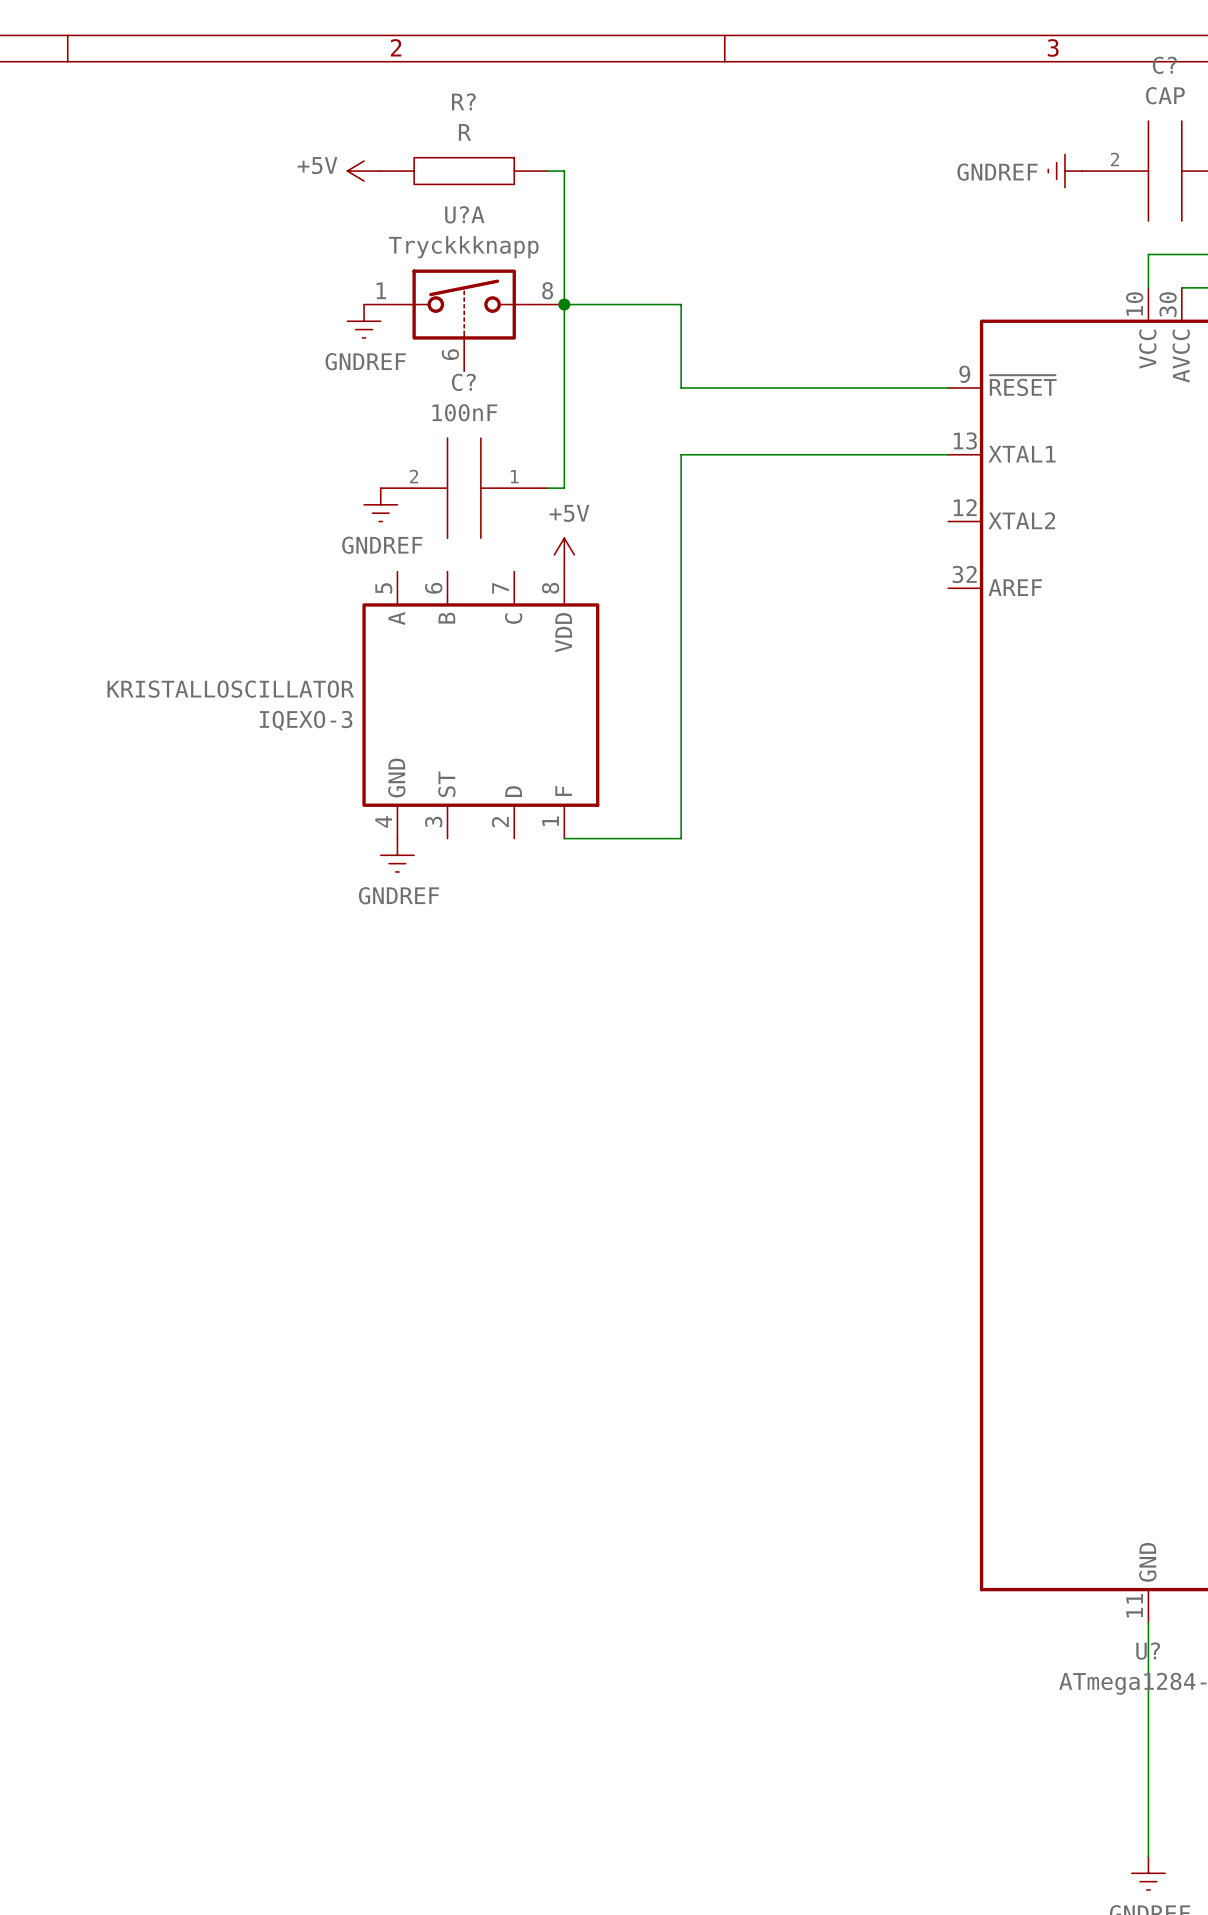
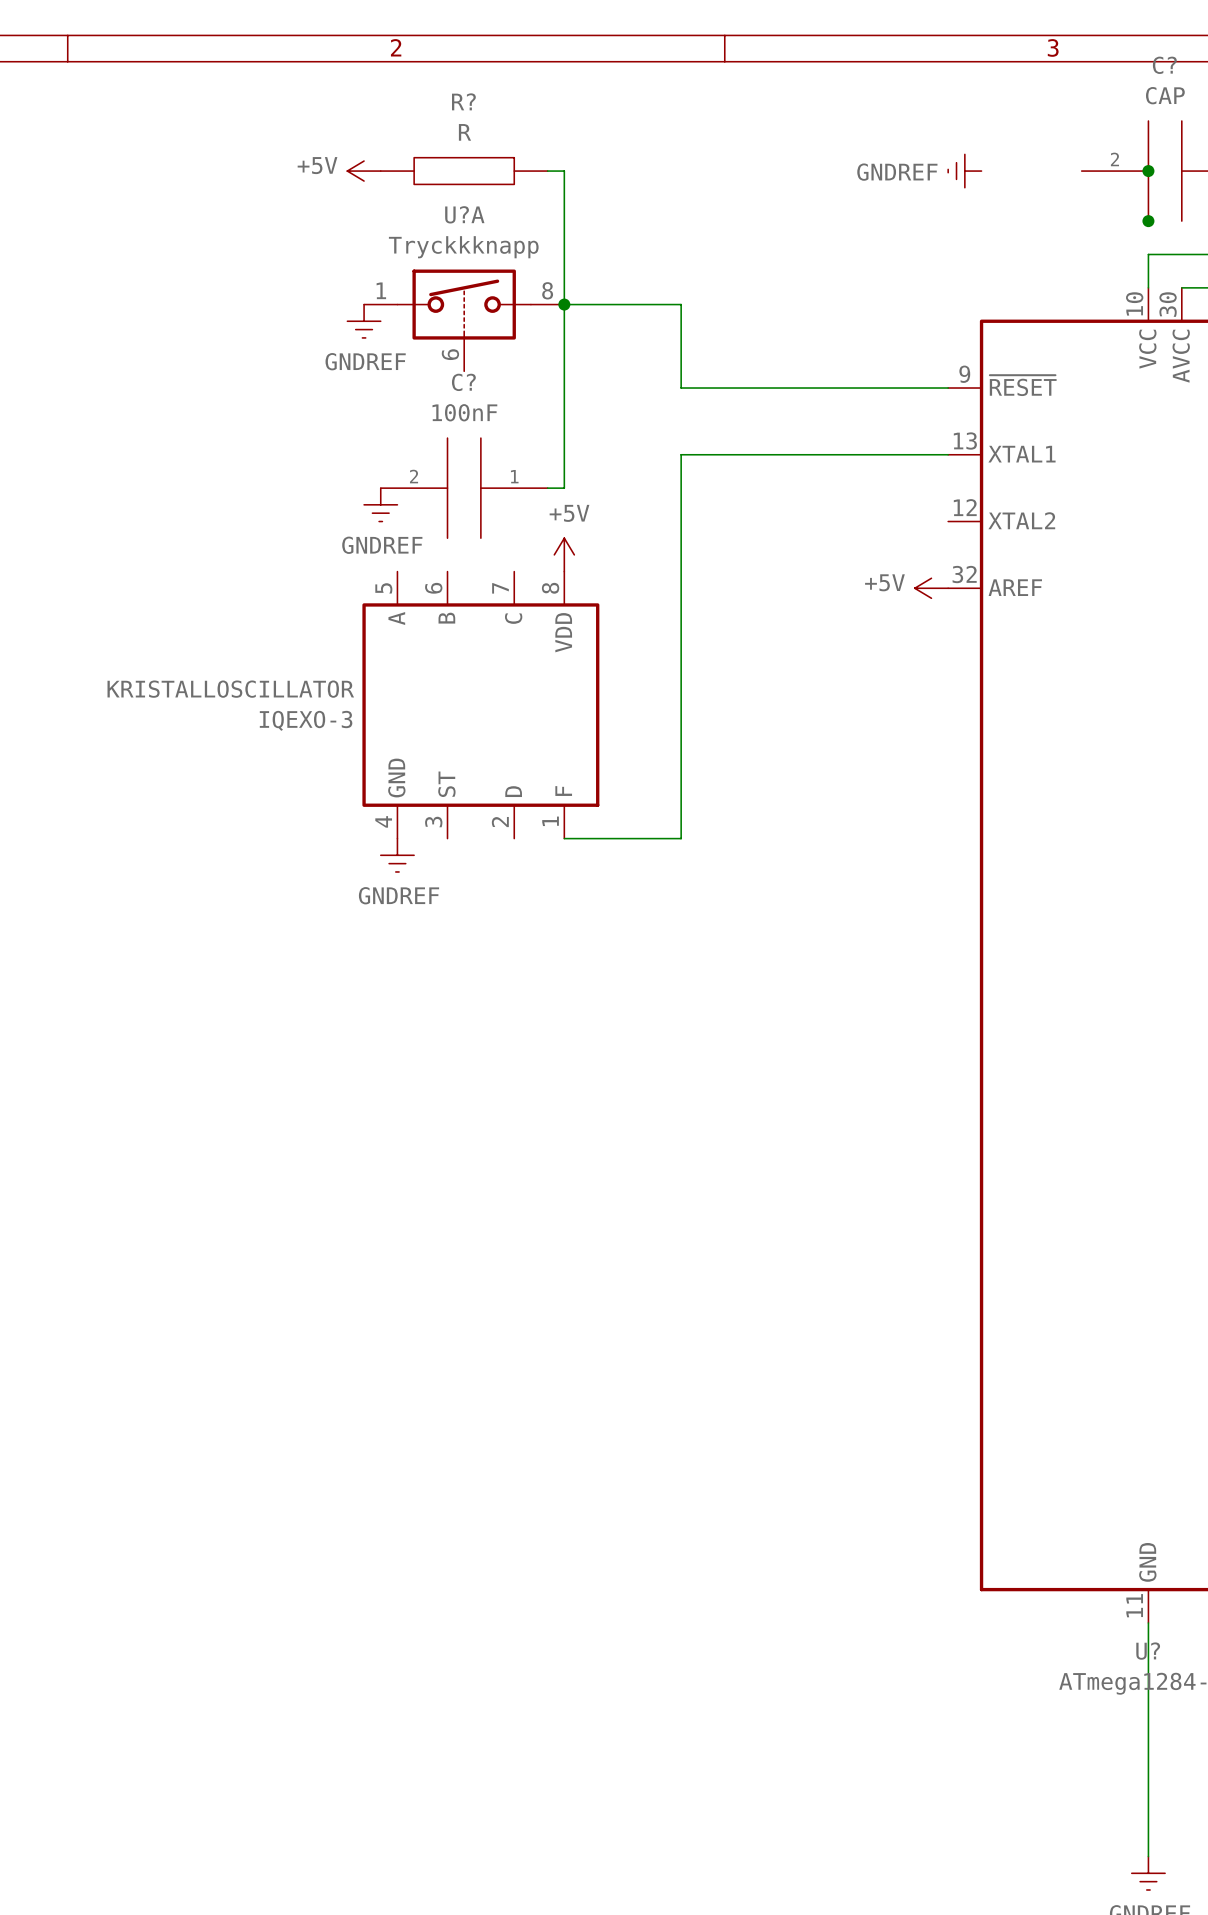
power symbol position: GNDREF (1064, 171) -> GNDREF (964, 171)
junction: none -> (1148, 171)
junction: none -> (1148, 221)
power symbol: none -> +5V (931, 588)

